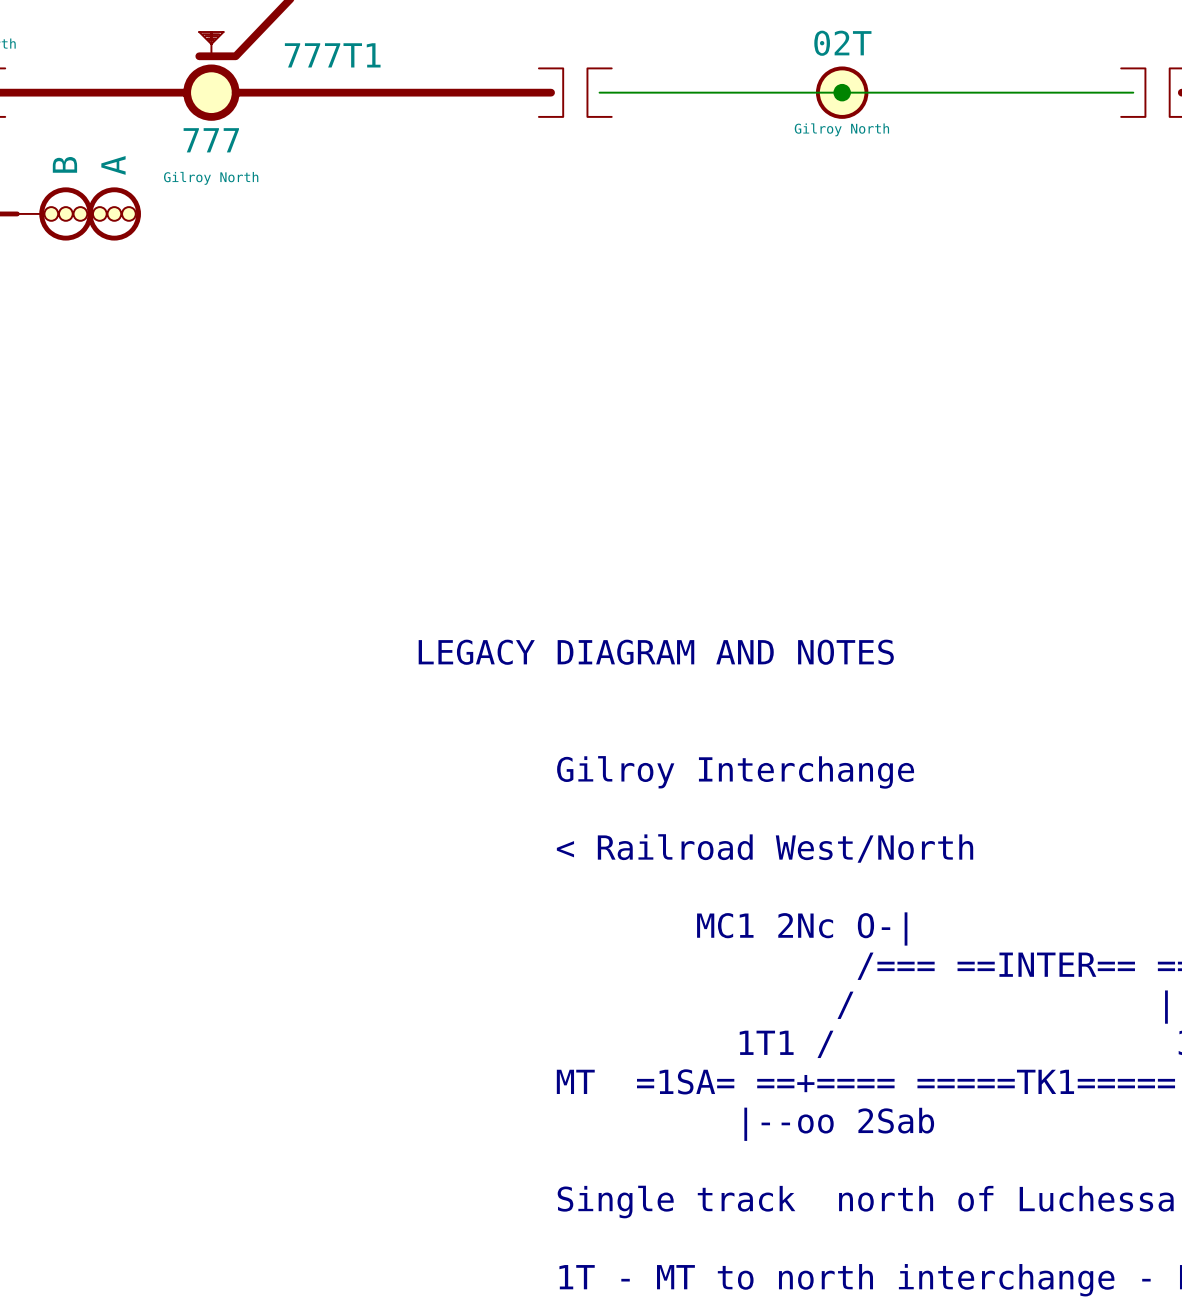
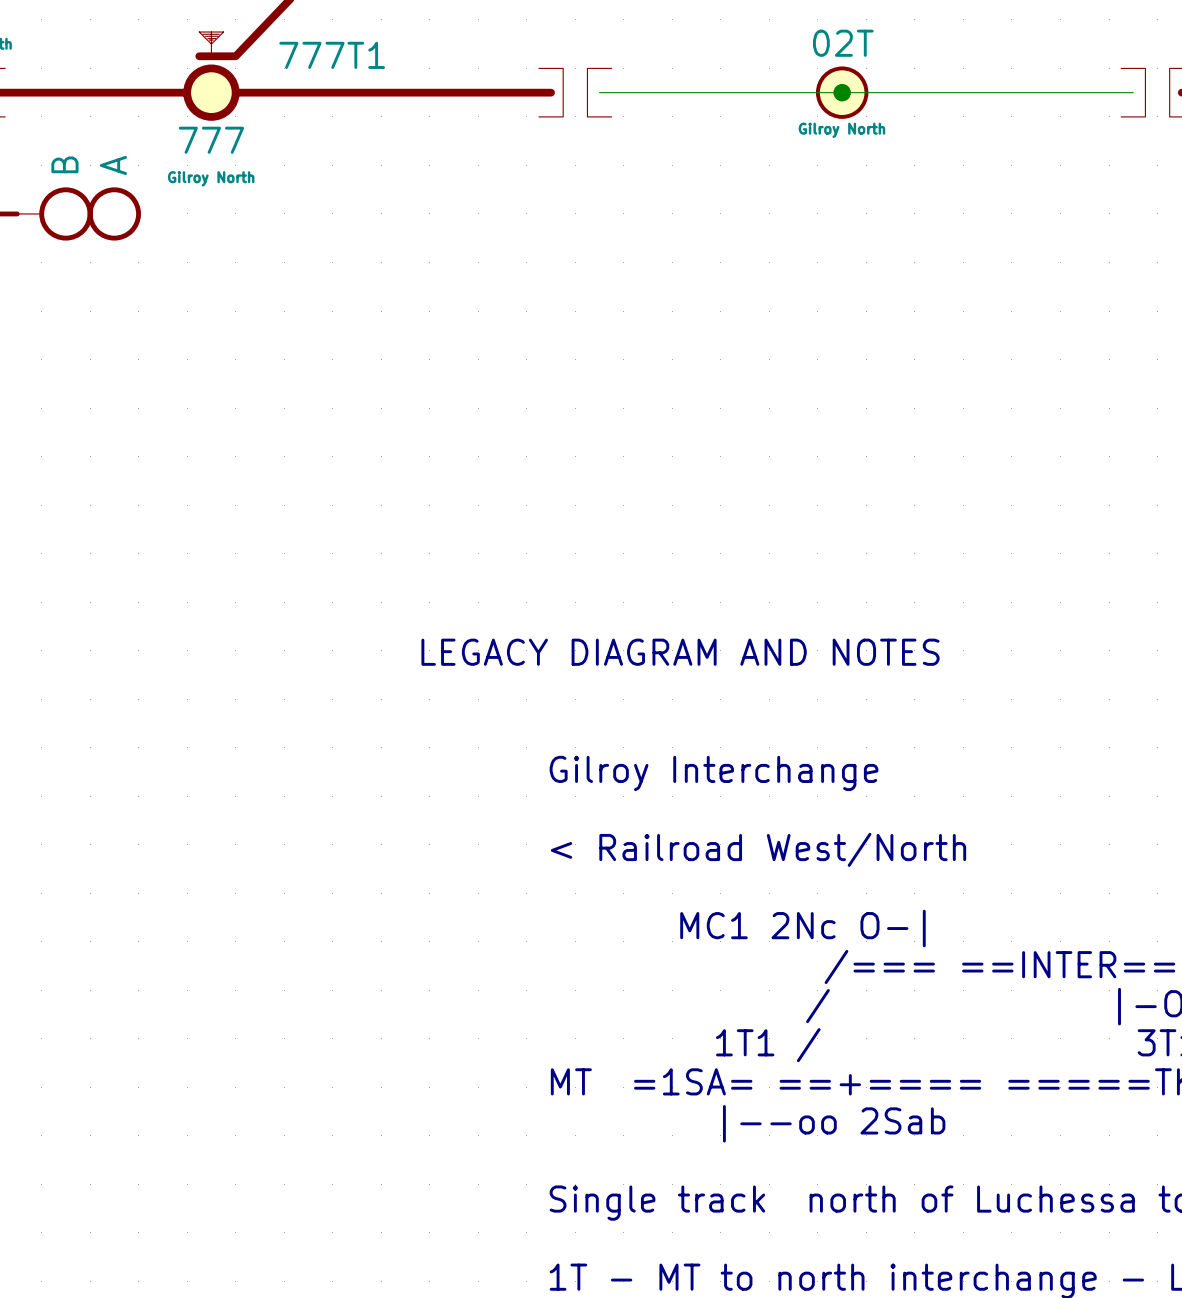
part symbol: [39, 187, 93, 241] -> [39, 187, 93, 241]
part symbol: [87, 187, 141, 241] -> [87, 187, 141, 241]

